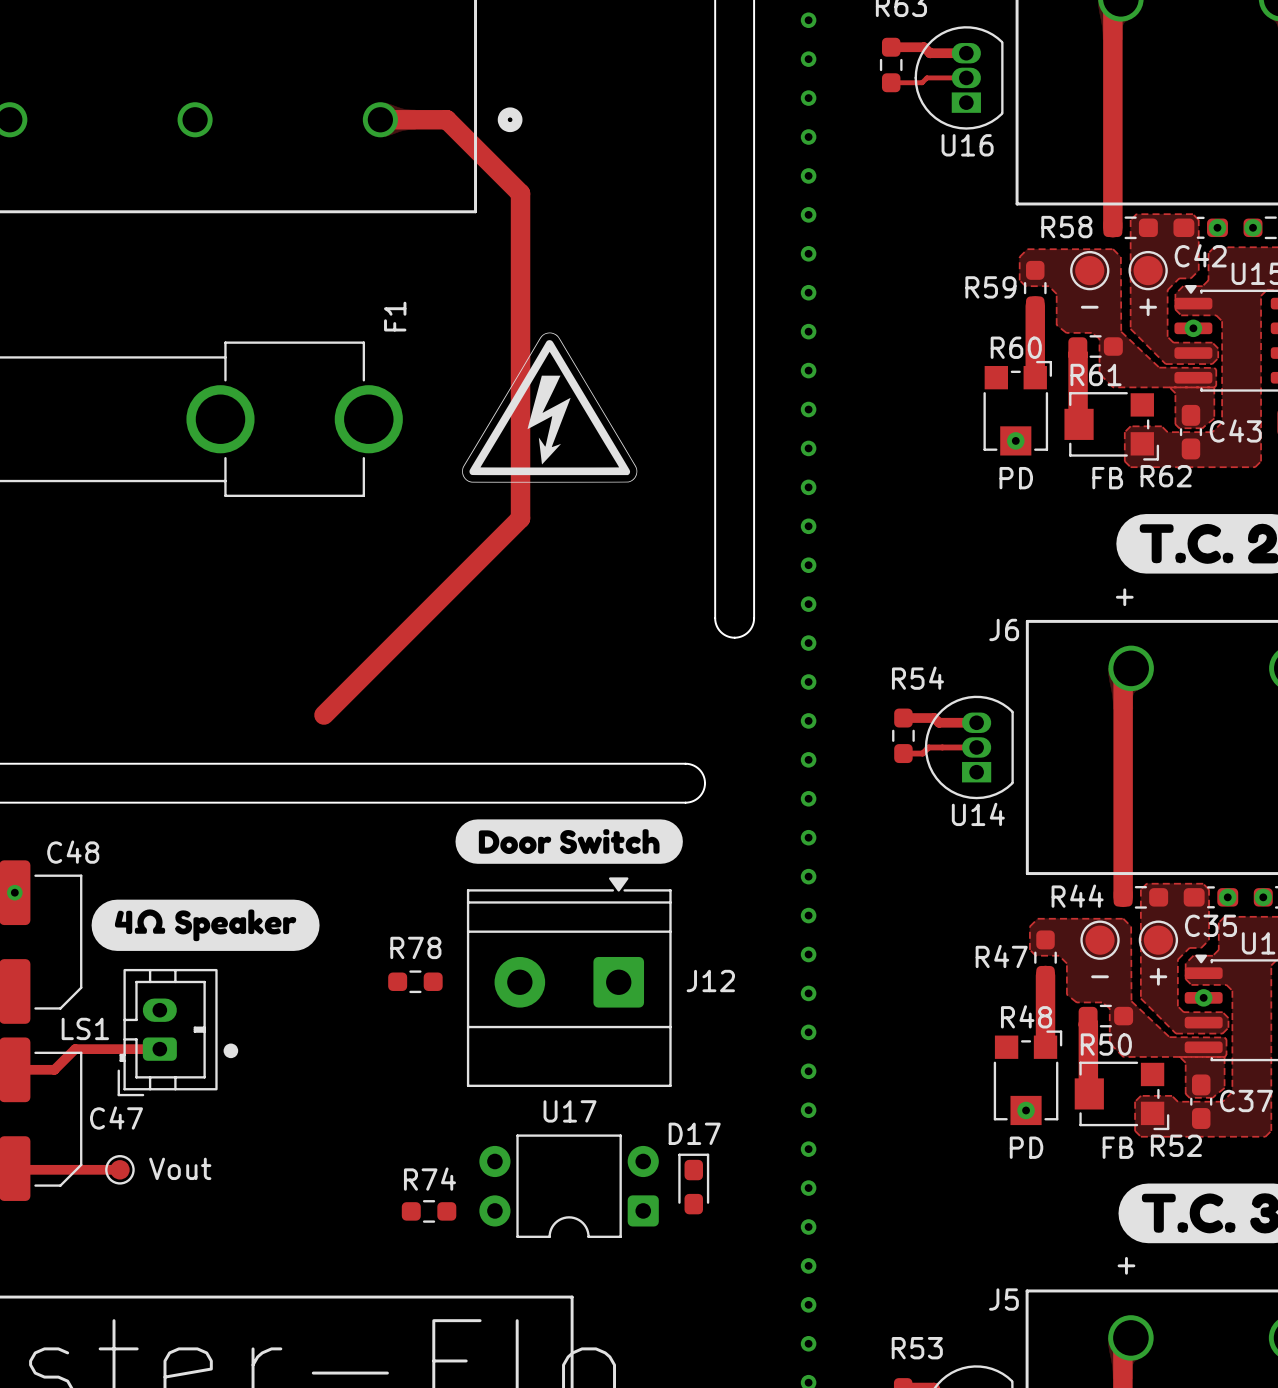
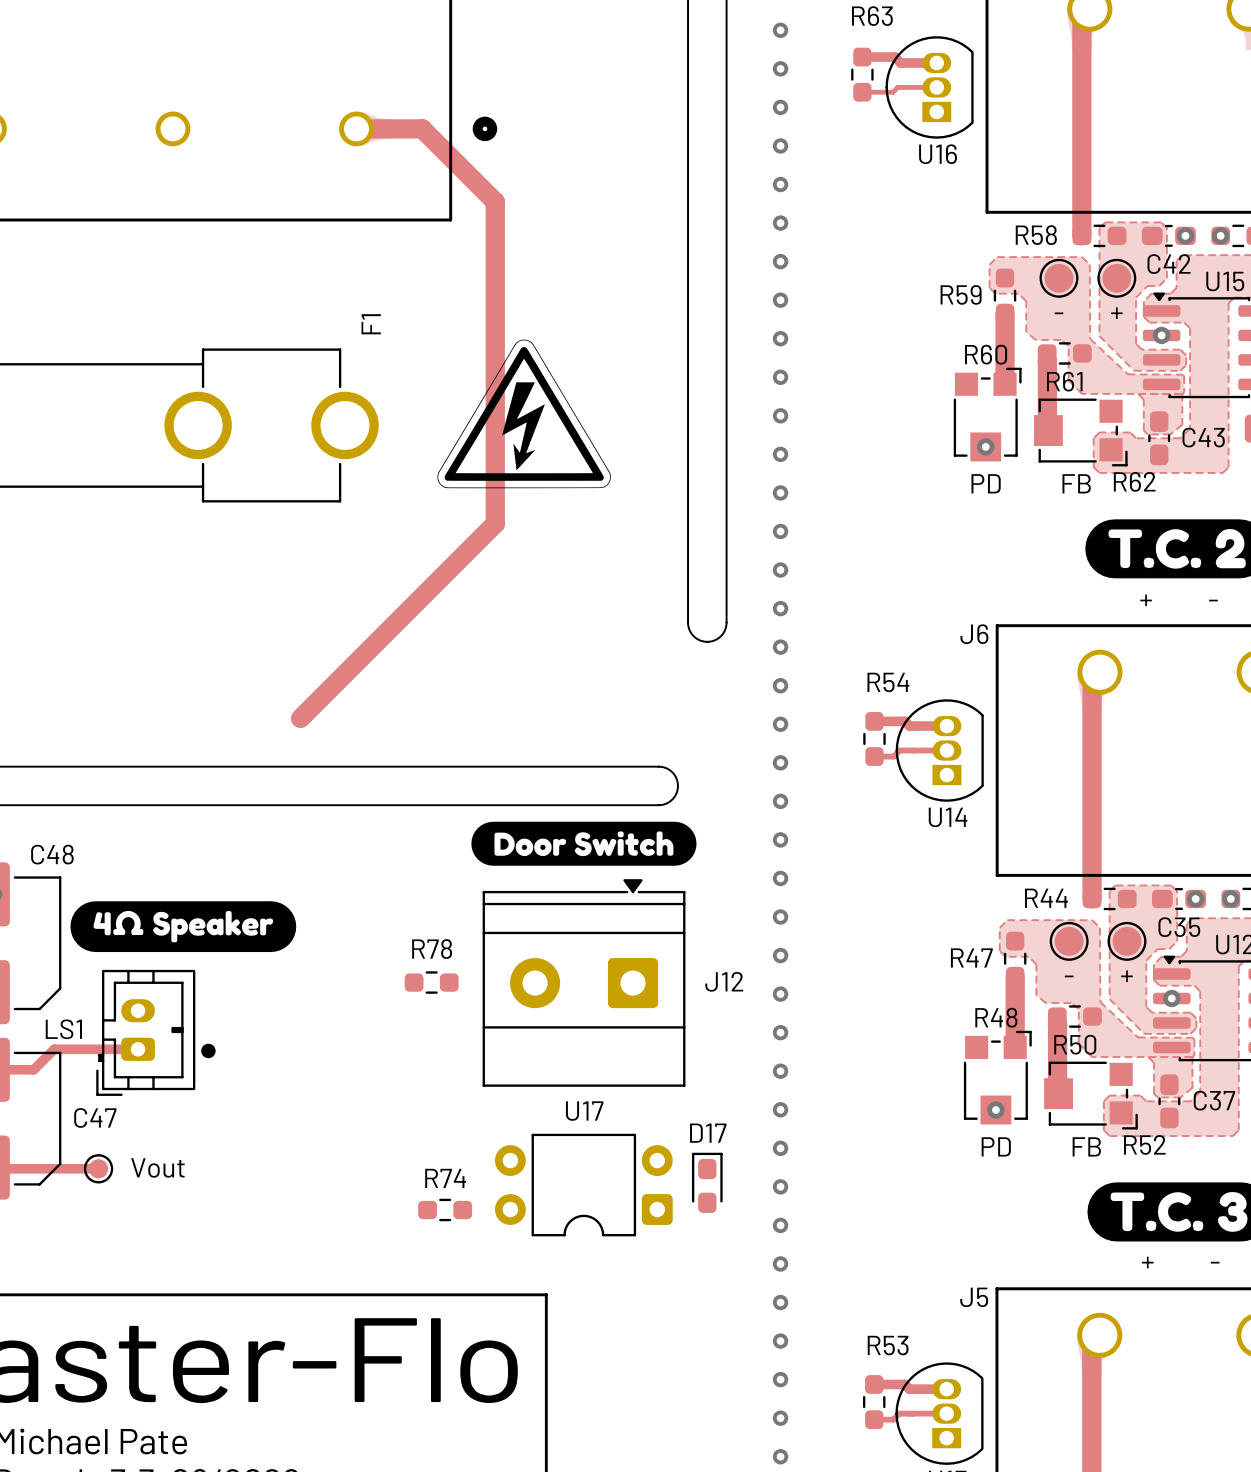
drawing position: (569, 841) -> (583, 843)
R78 position: (415, 981) -> (431, 982)
J12 position: (569, 982) -> (584, 982)
D17 position: (693, 1183) -> (707, 1182)
U17 position: (569, 1186) -> (583, 1185)
R74 position: (429, 1211) -> (445, 1210)

